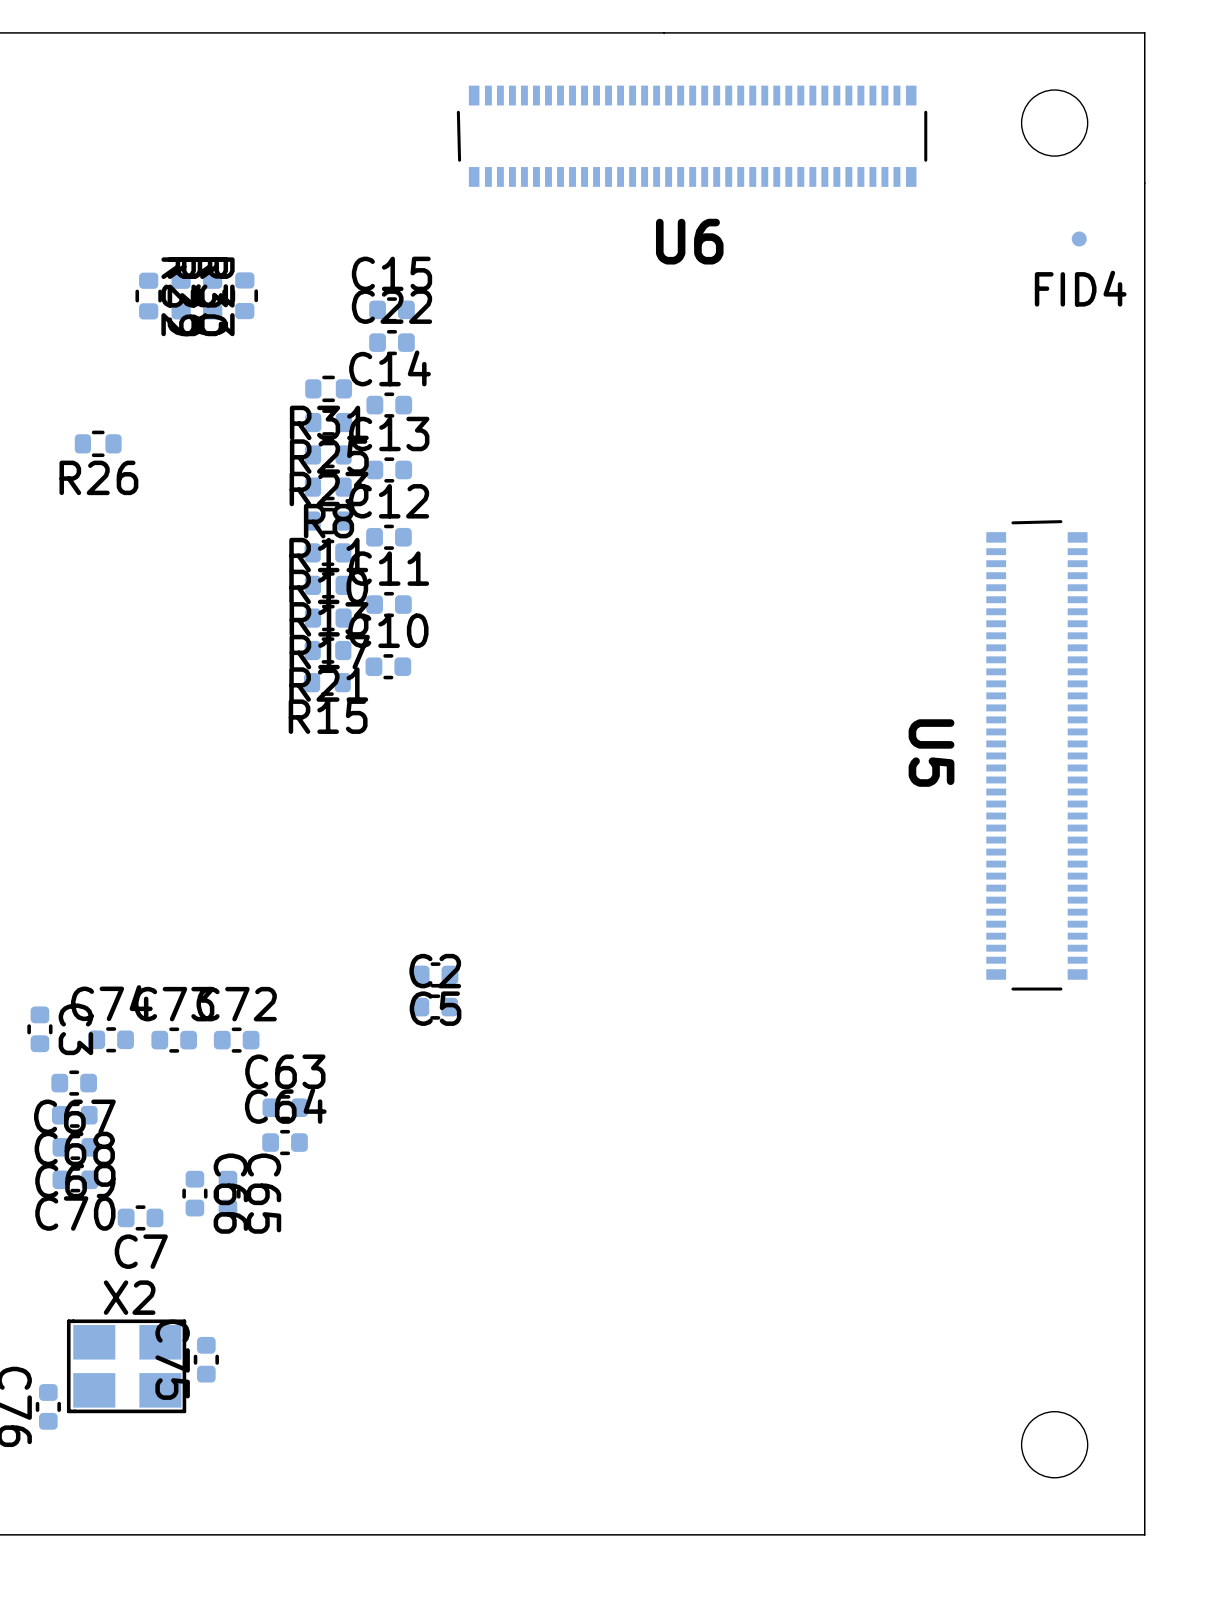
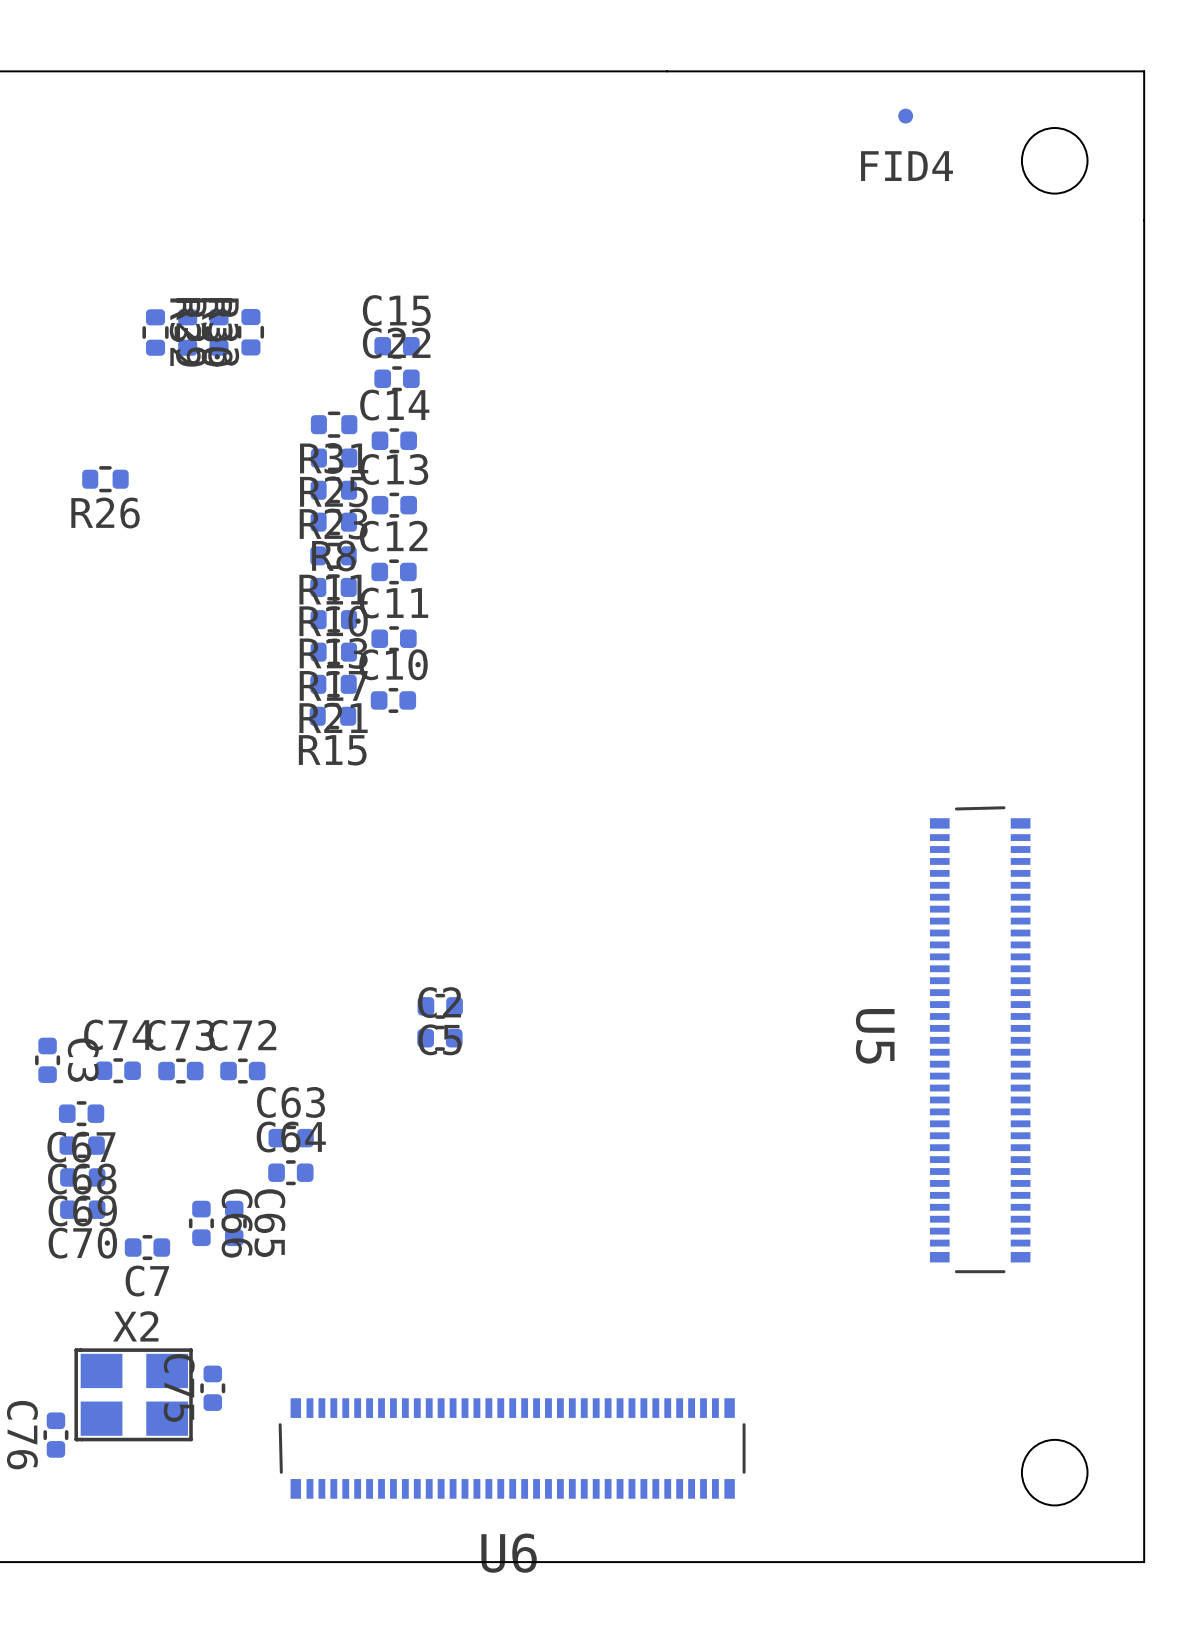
U6 position: (692, 136) -> (512, 1448)
FID4 position: (1079, 238) -> (905, 116)
U5 position: (1036, 755) -> (980, 1039)

